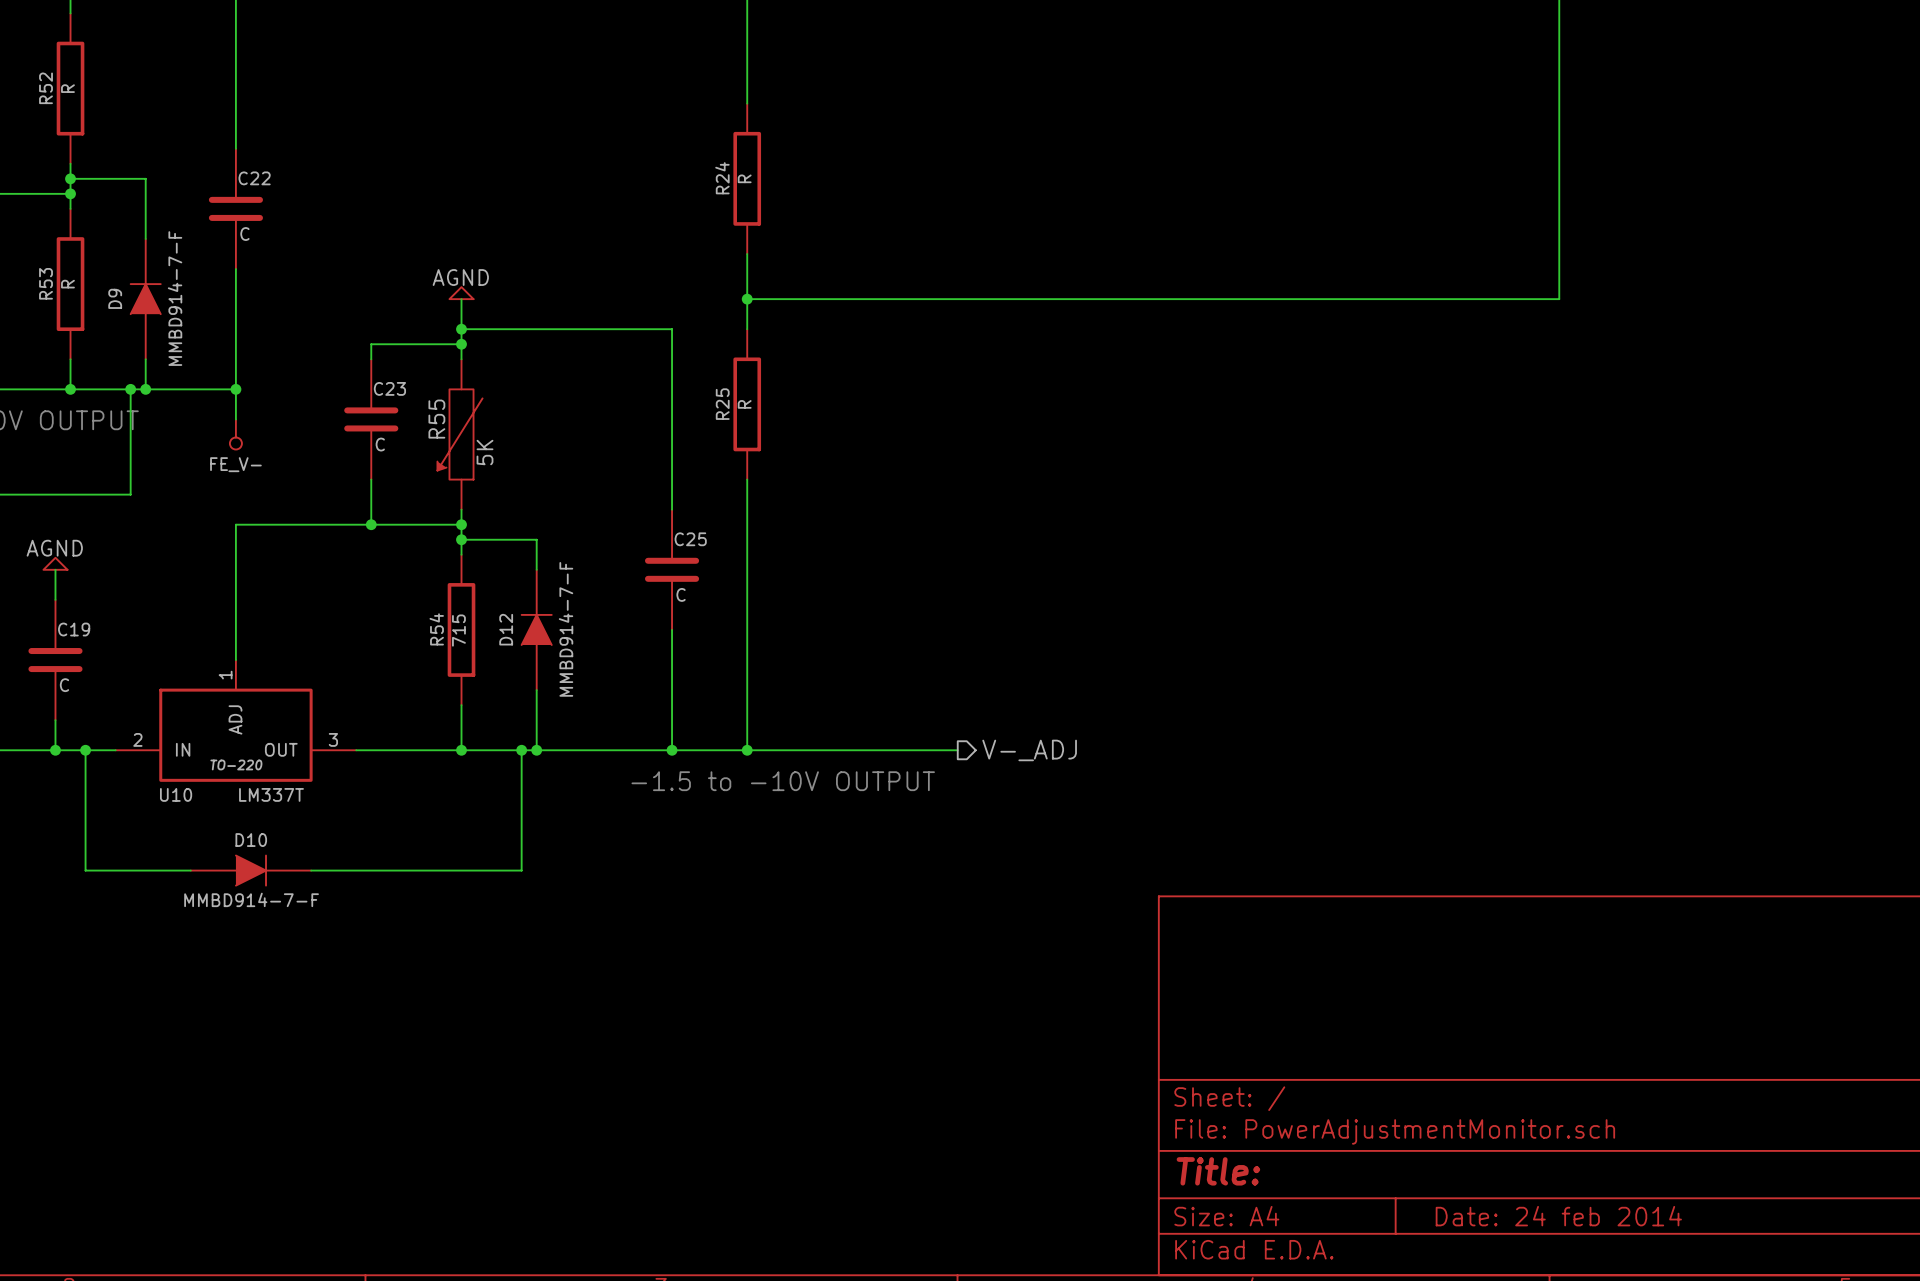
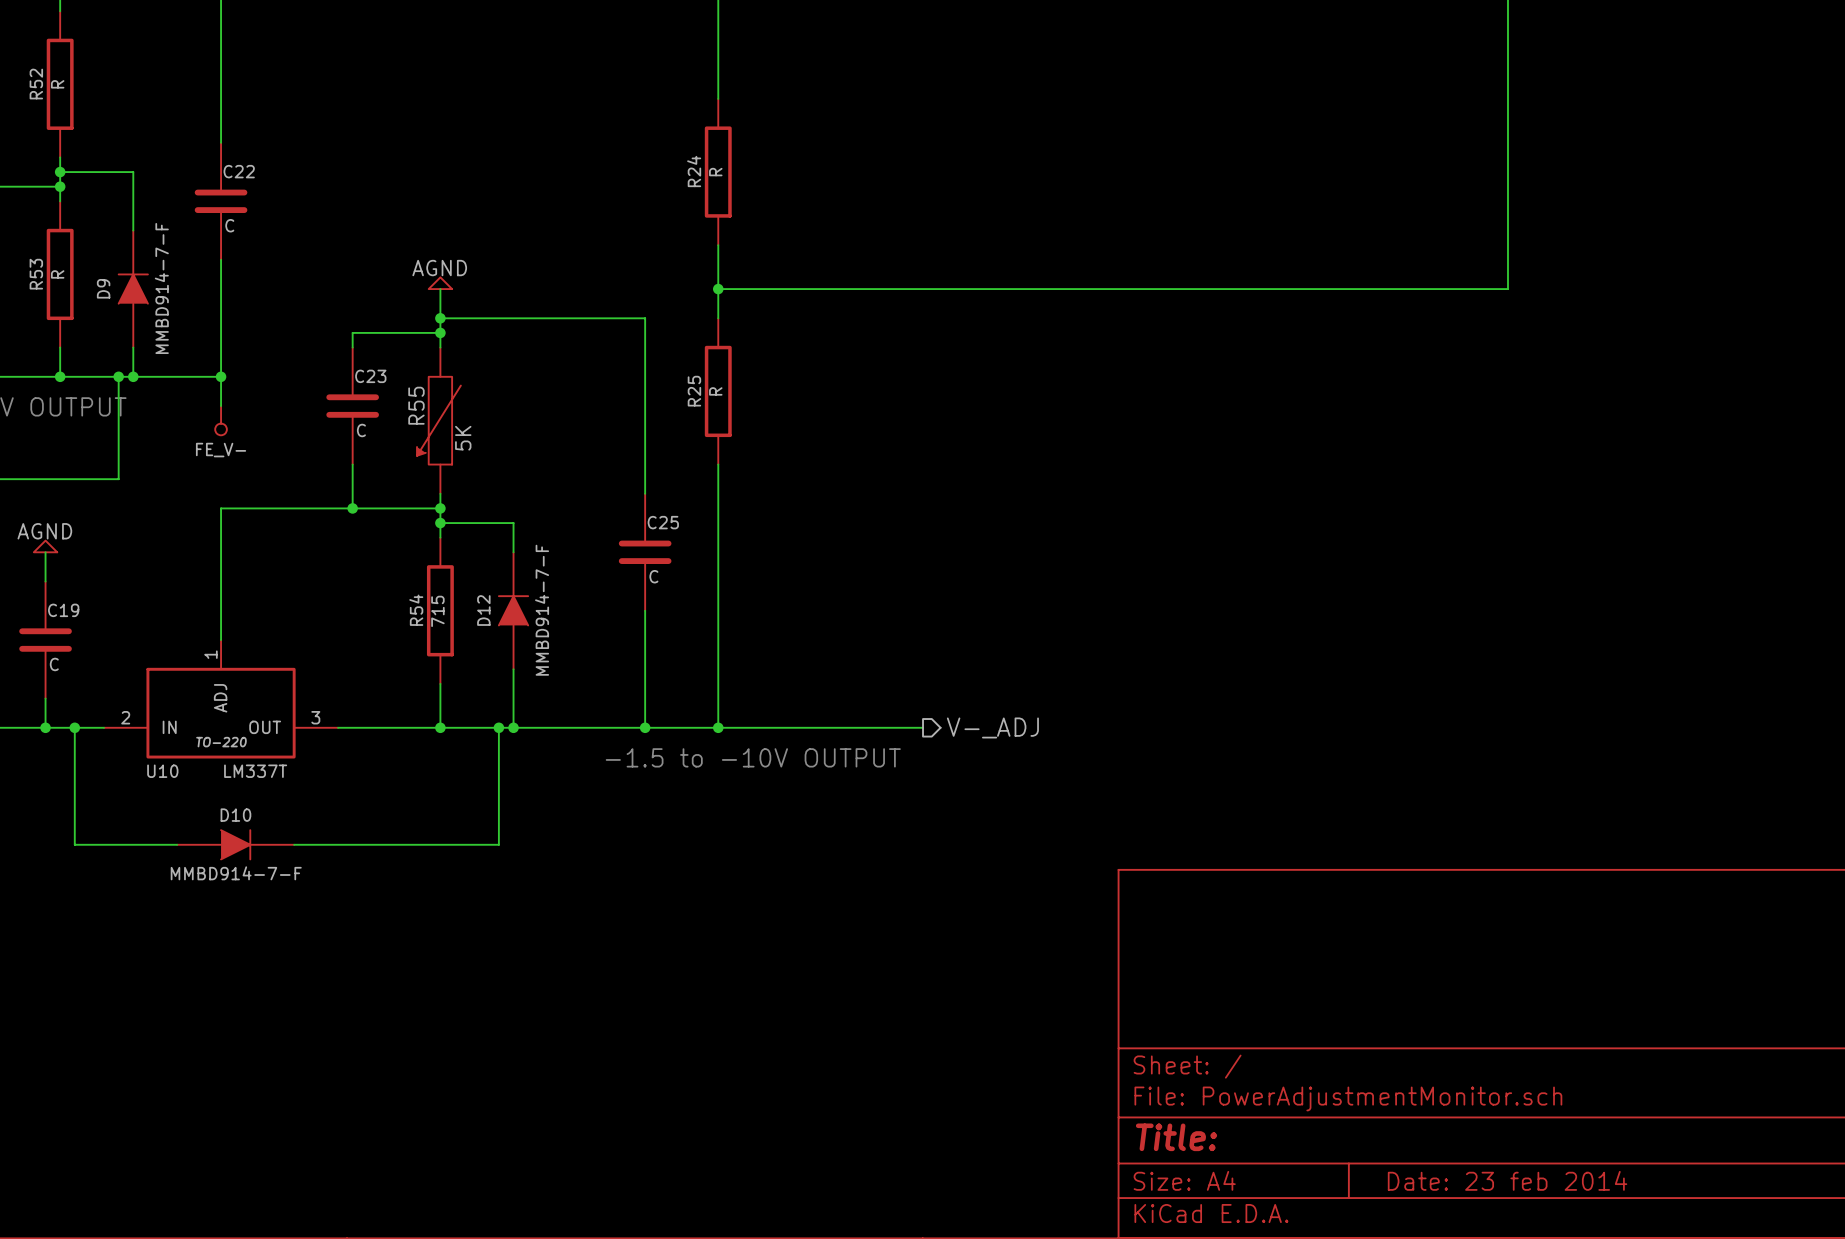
title block: Date: 24 feb 2014 (1558, 1216) -> Date: 23 feb 2014 (1507, 1180)

